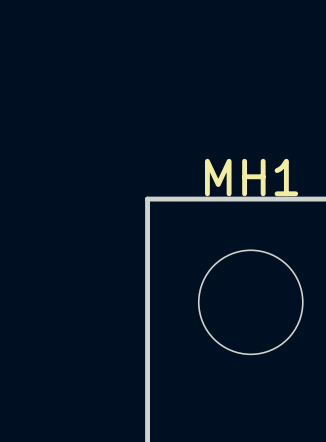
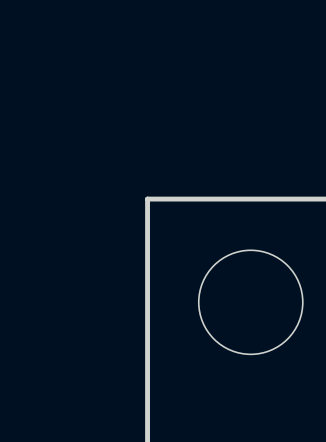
MH1 name: MH1 (251, 177) -> none

